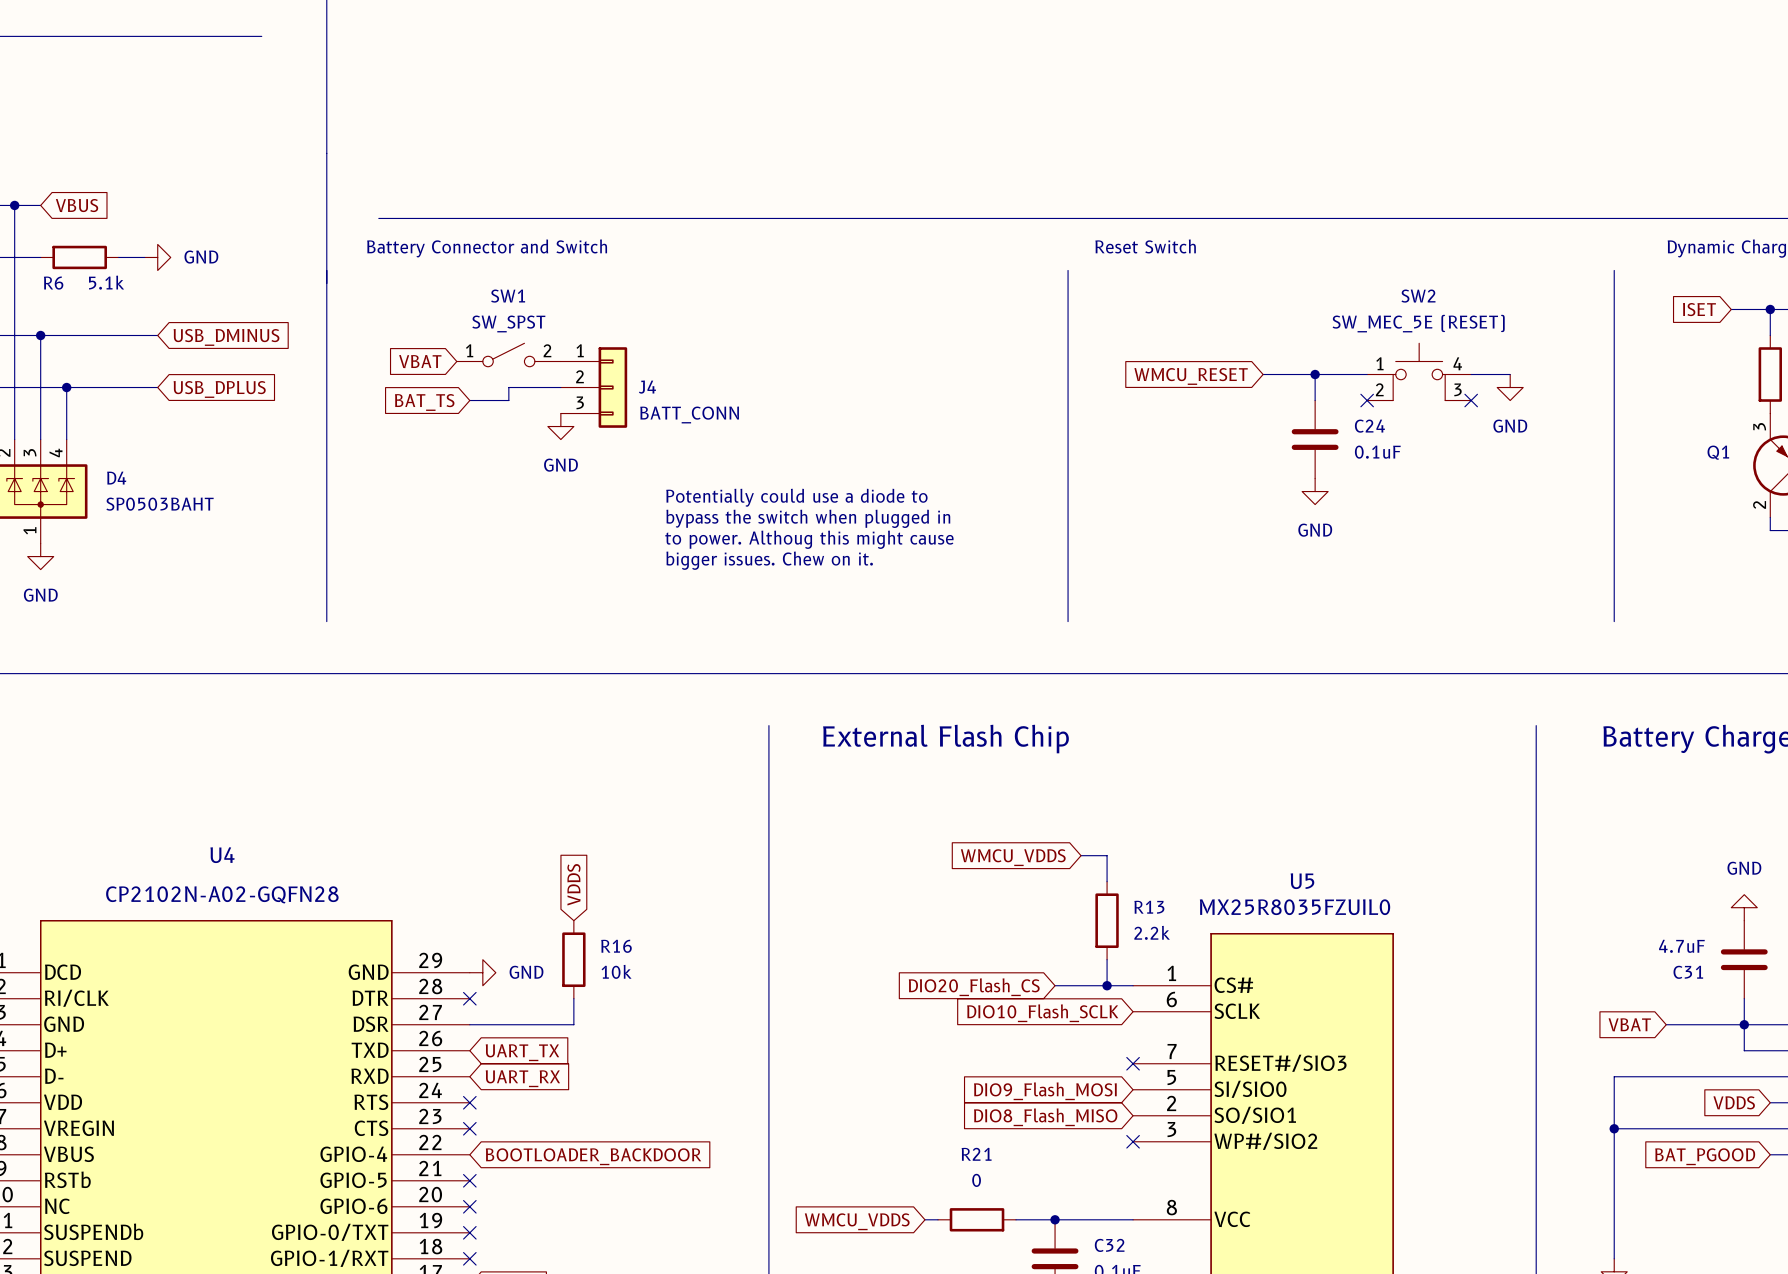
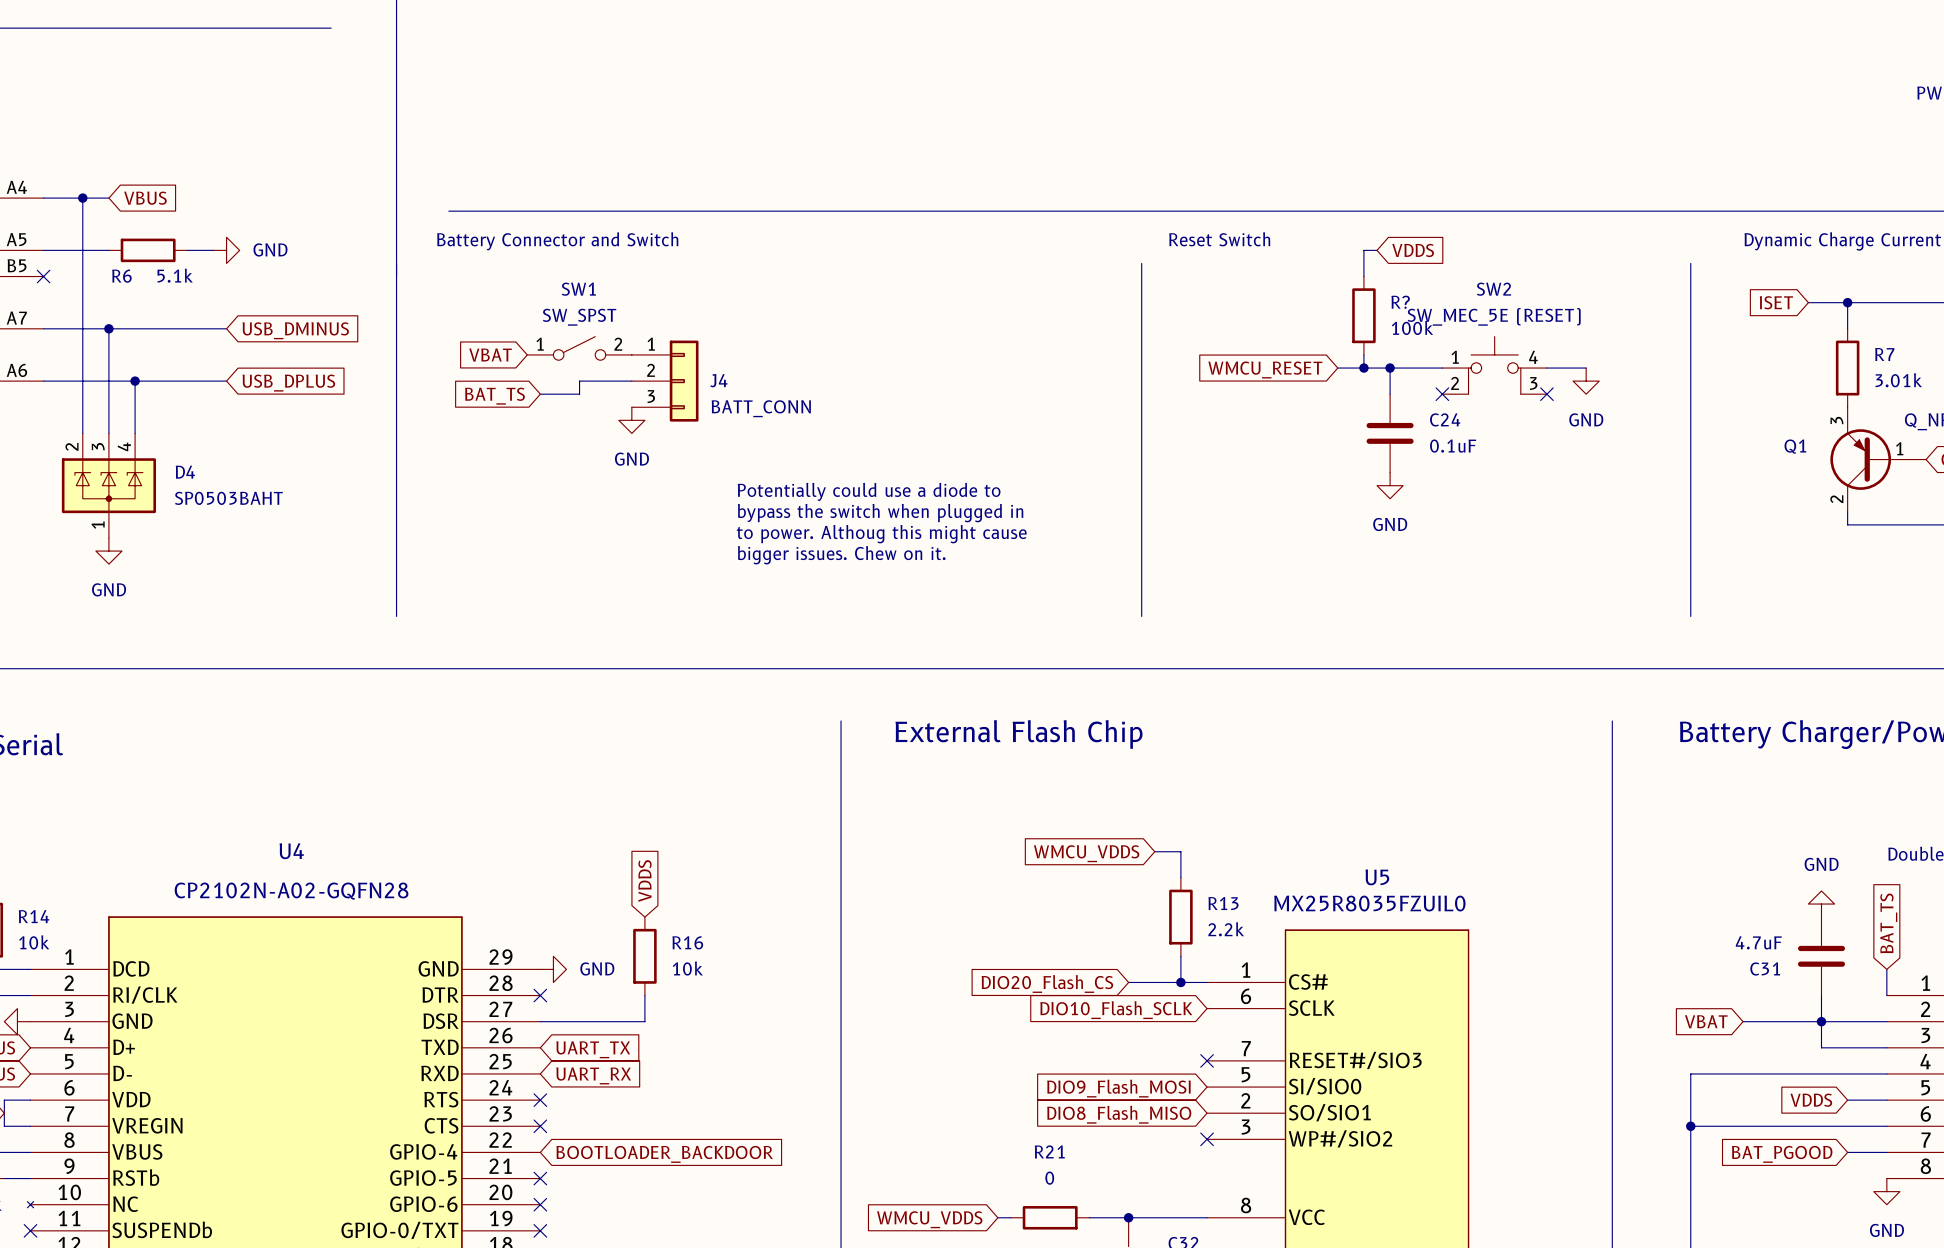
wire: none -> (1377, 250) (1363, 250) (1363, 276)
global label: none -> VDDS (1413, 250)
R?: none -> 100k (1363, 315)
wire: none -> (1363, 354) (1363, 368)
junction: none -> (1363, 368)

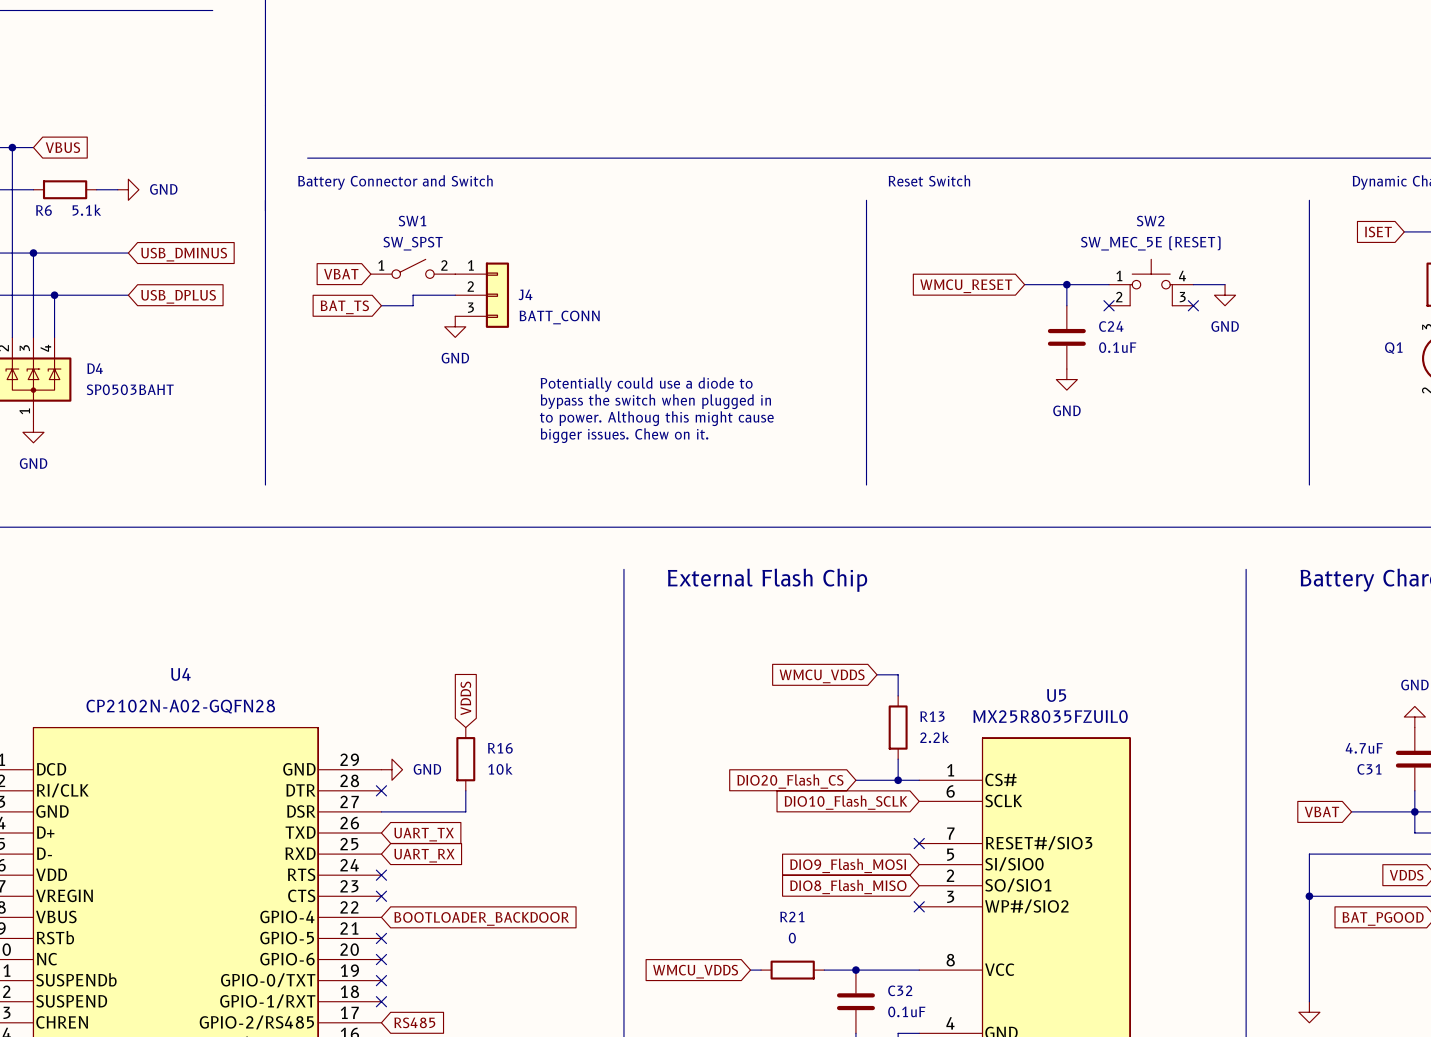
wire: (1377, 250) (1363, 250) (1363, 276) -> none
global label: VDDS (1413, 250) -> none
R?: 100k (1363, 315) -> none
wire: (1363, 354) (1363, 368) -> none
junction: (1363, 368) -> none

